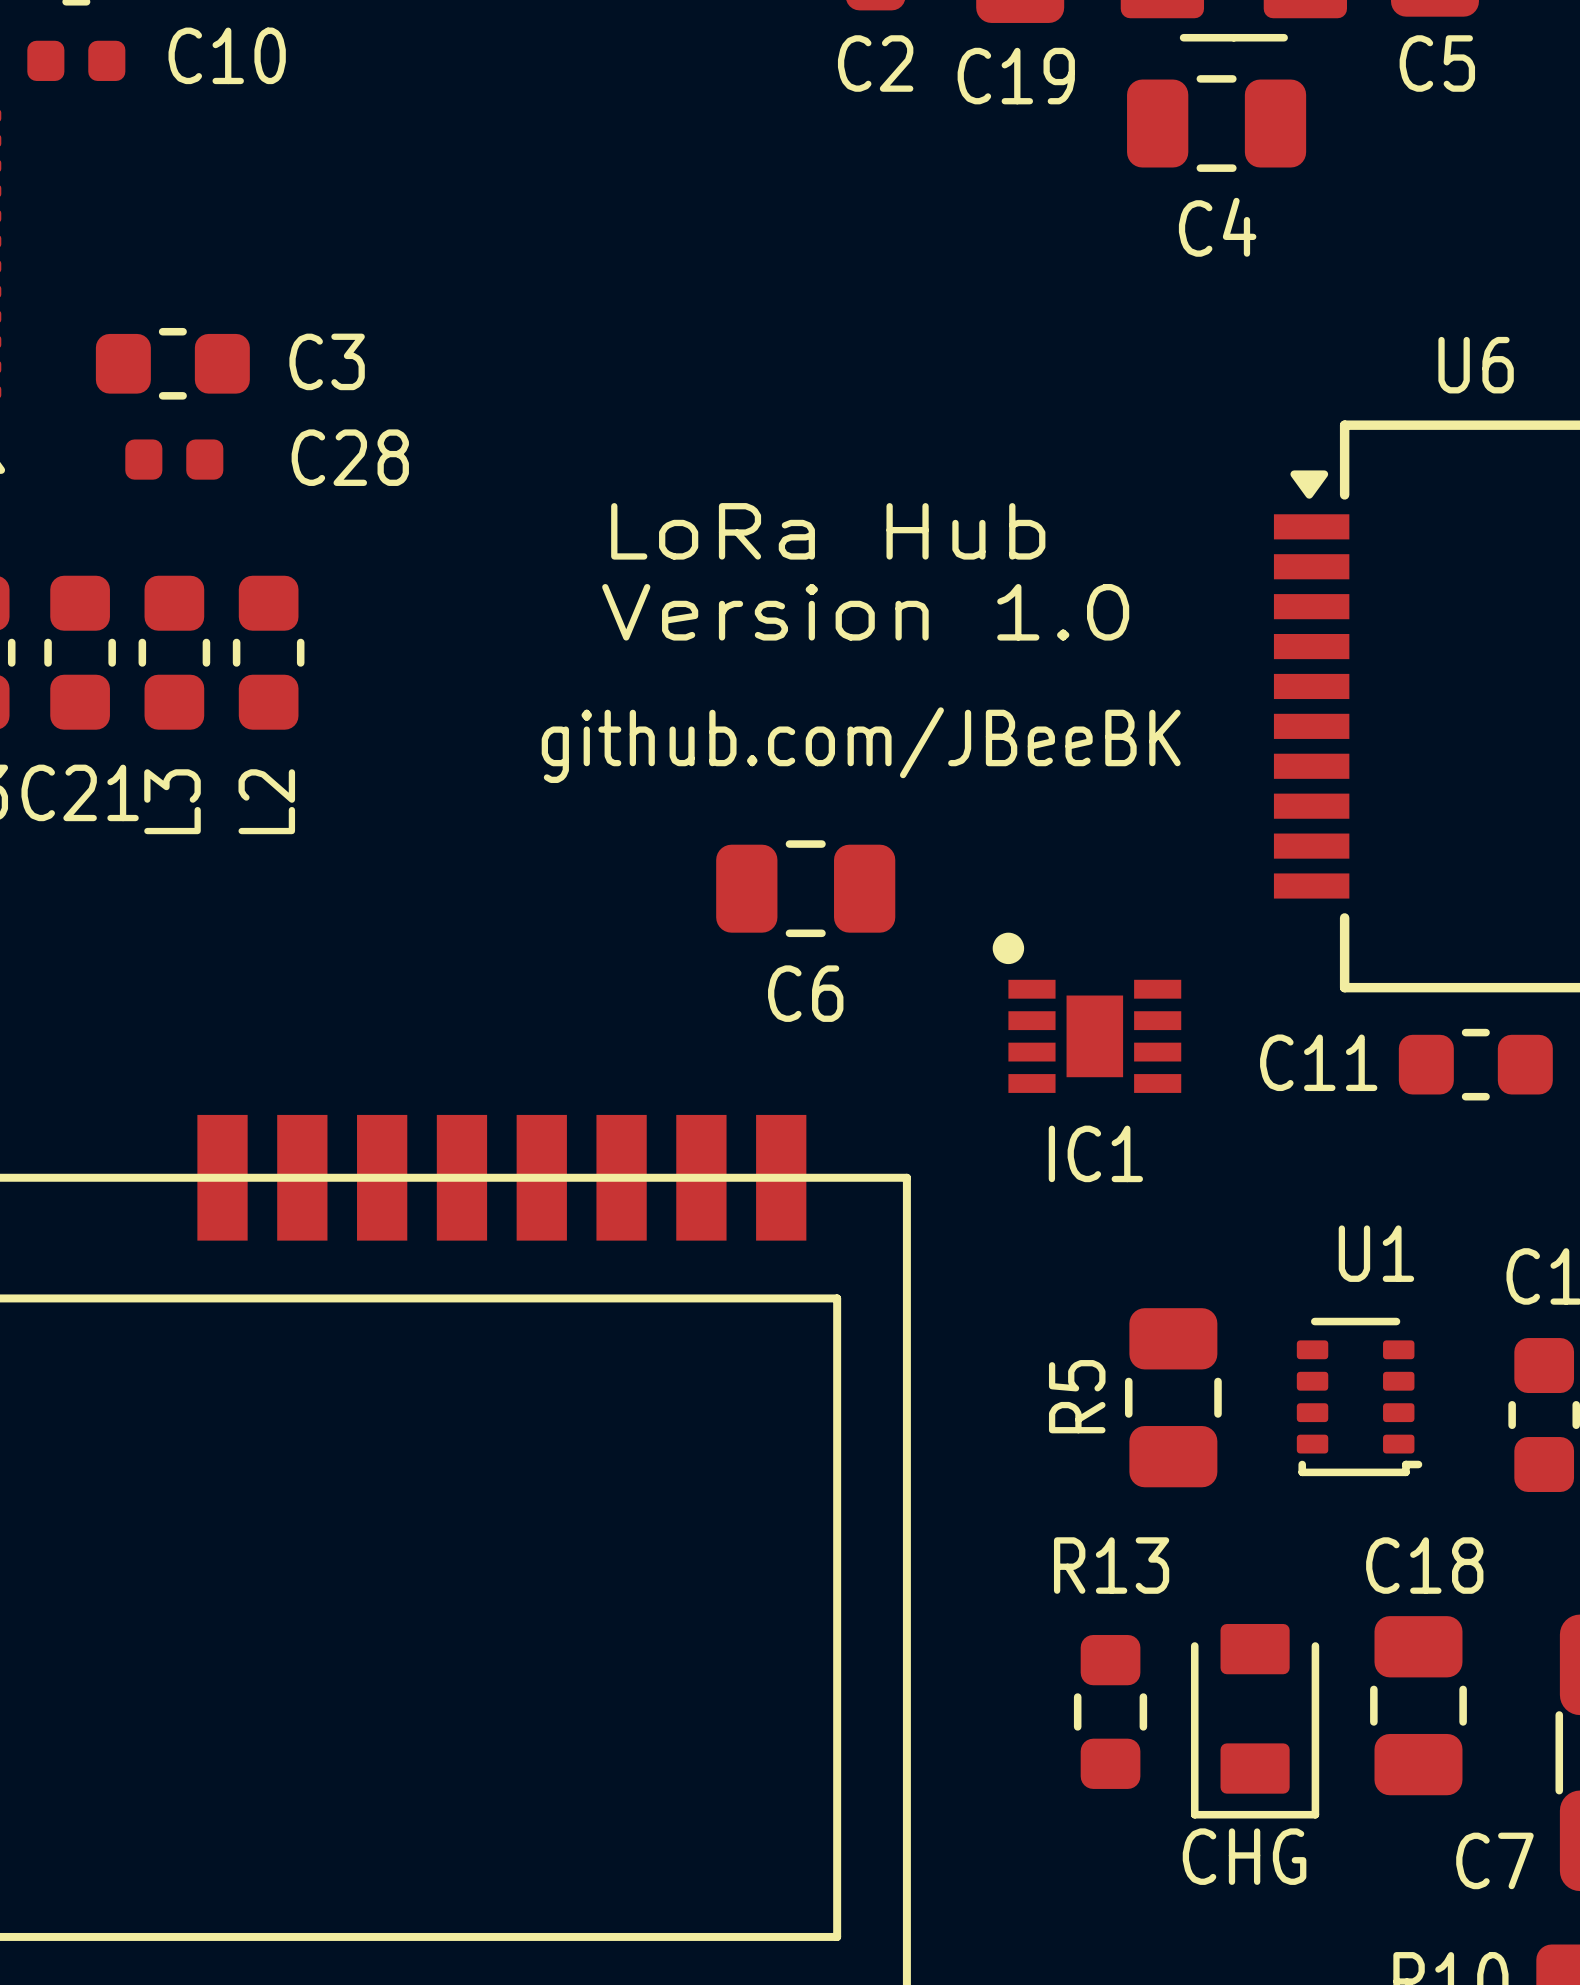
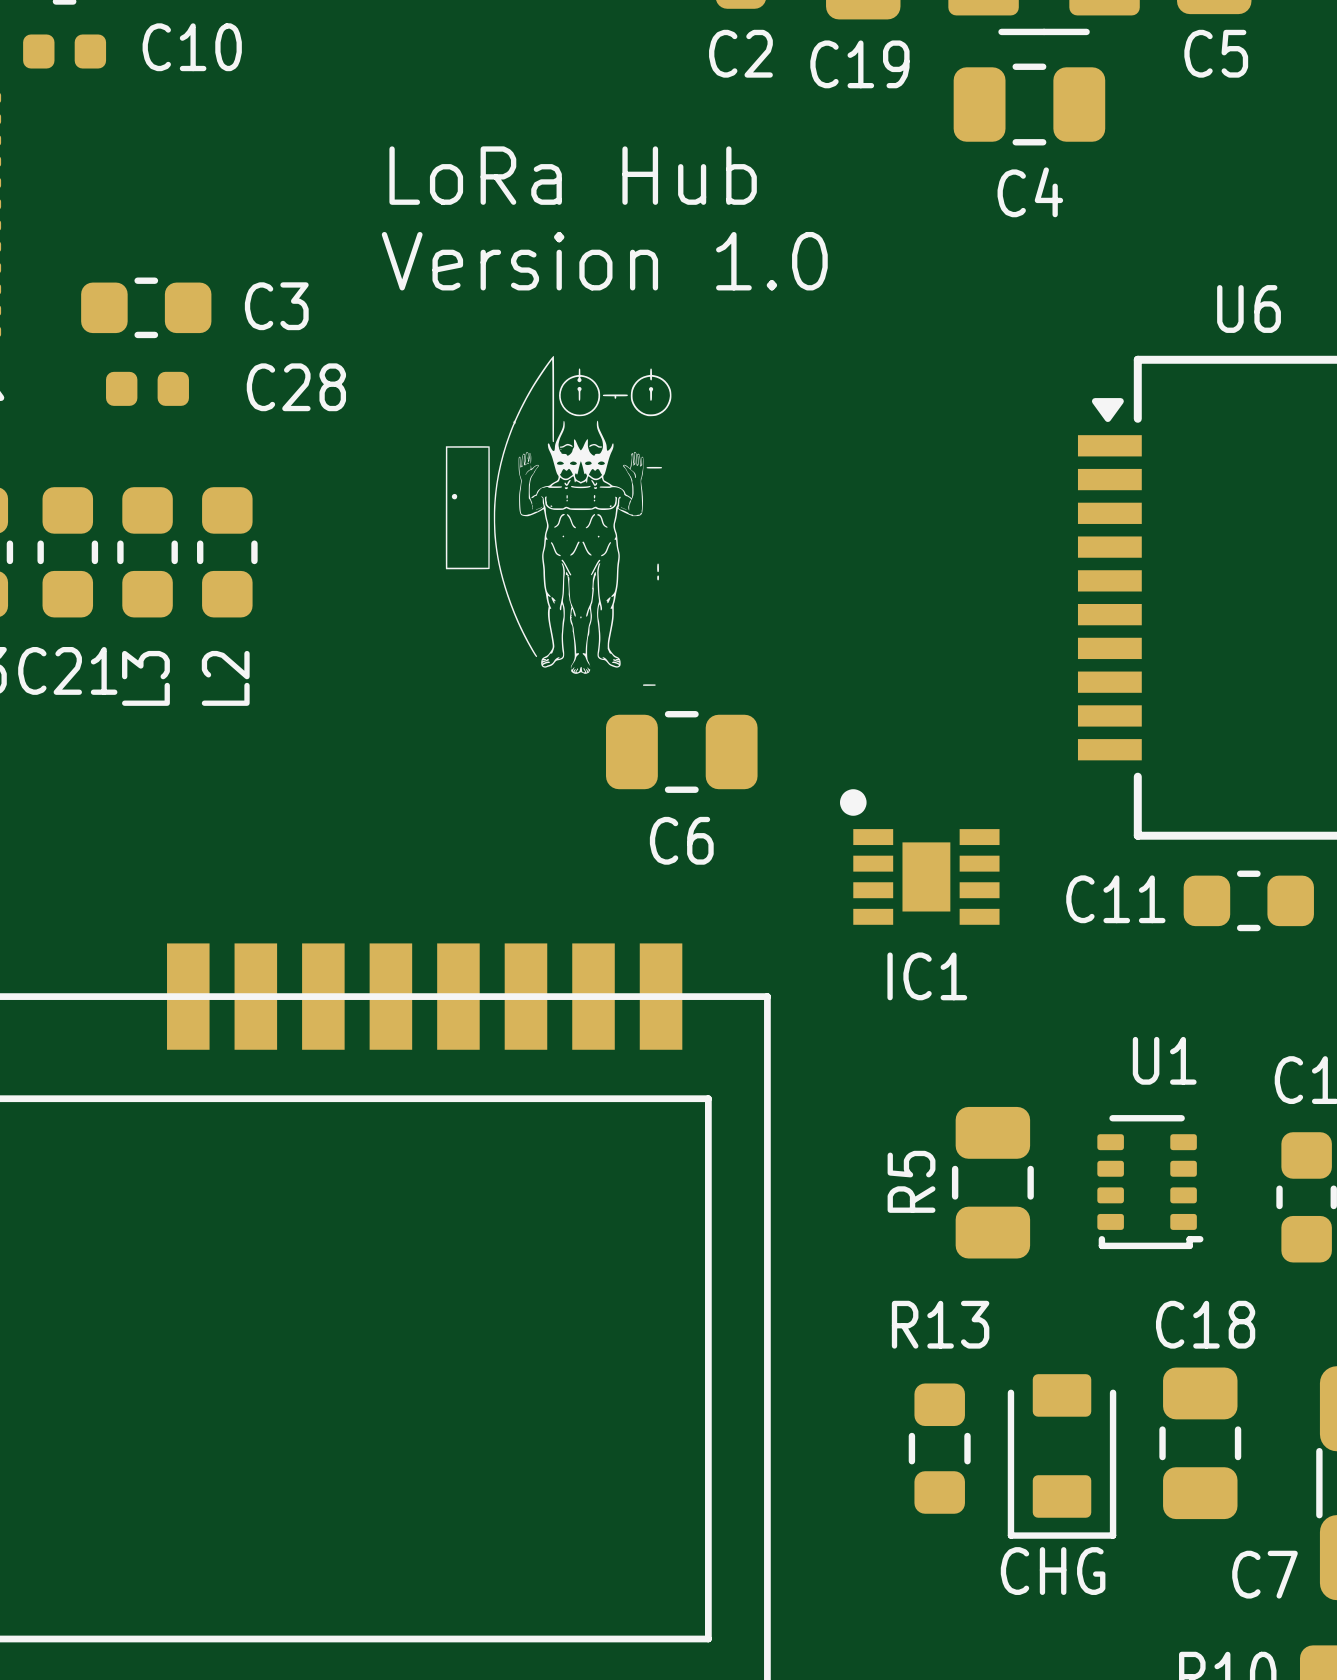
drawing: none -> [445, 355, 672, 686]
text position: LoRa Hub (828, 531) -> LoRa Hub (573, 175)
text position: Version 1.0 (865, 612) -> Version 1.0 (604, 261)
text: github.com/JBeeBK (861, 745) -> none

